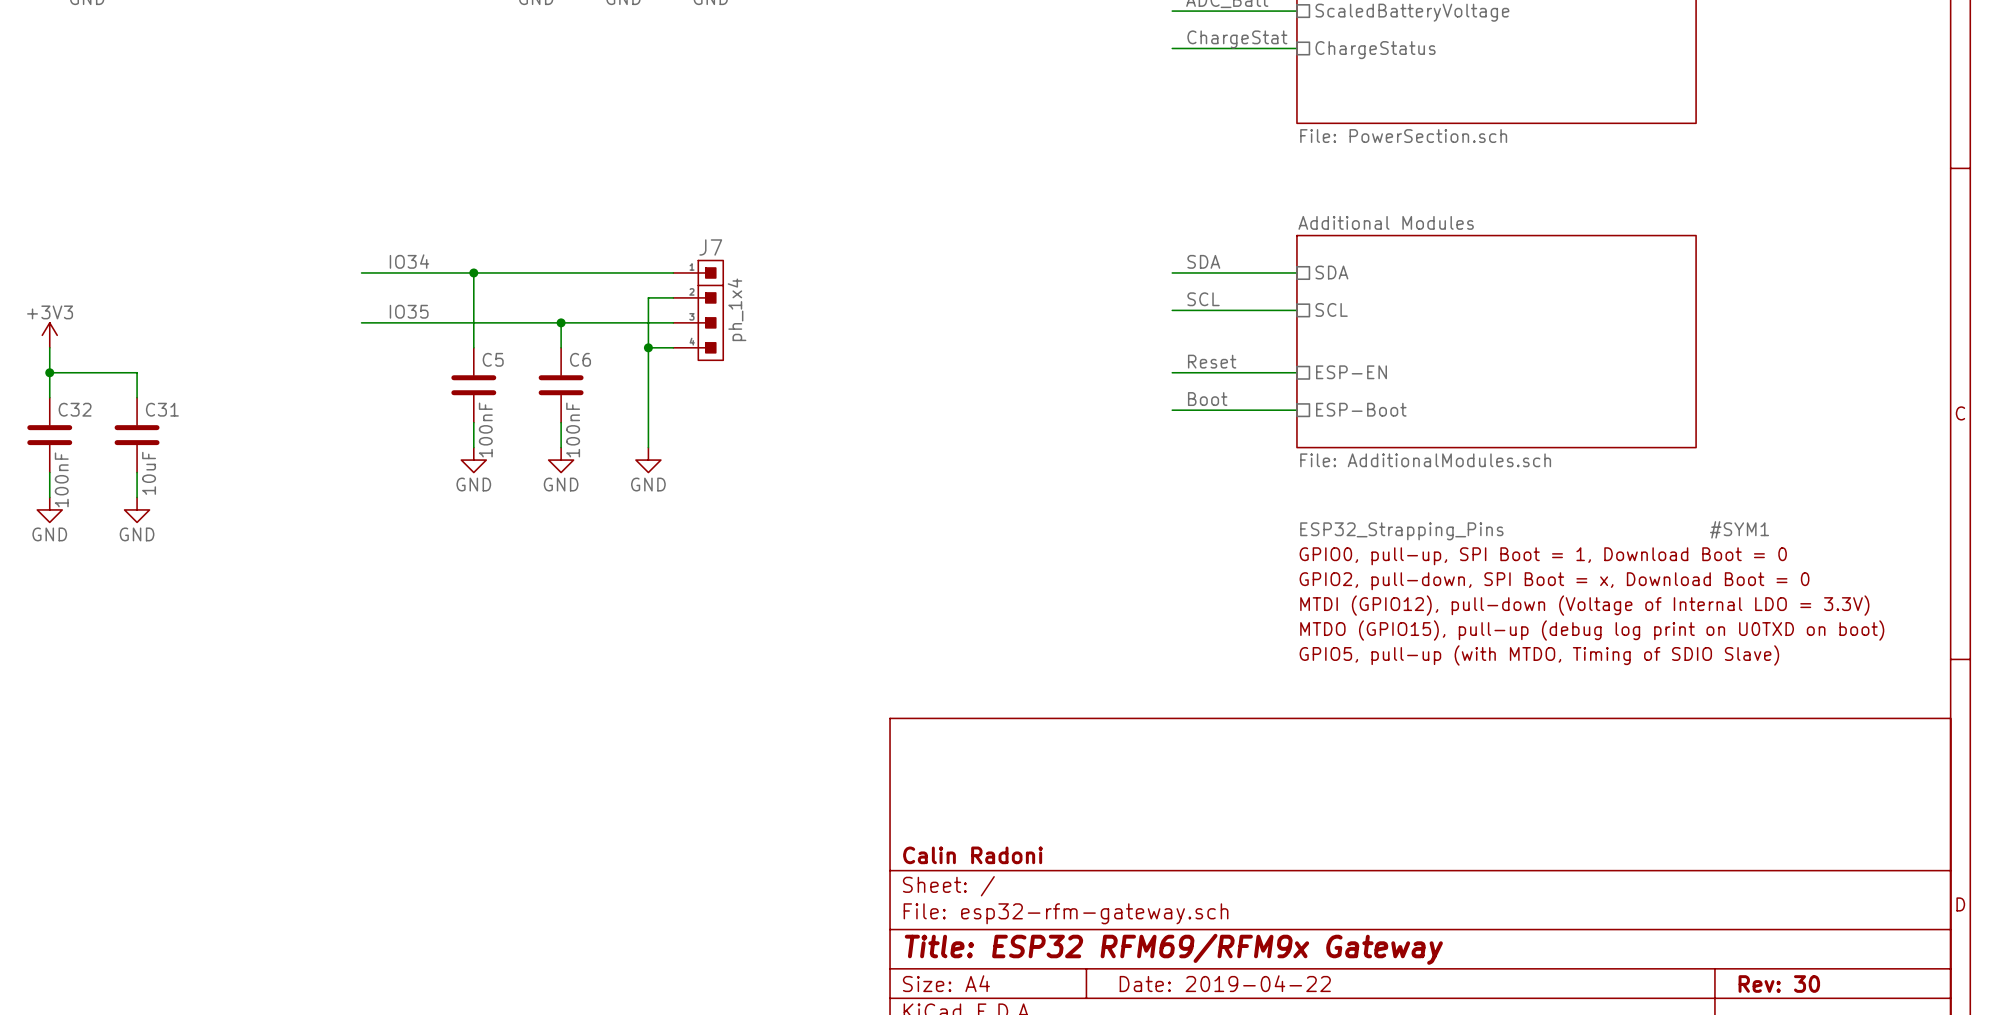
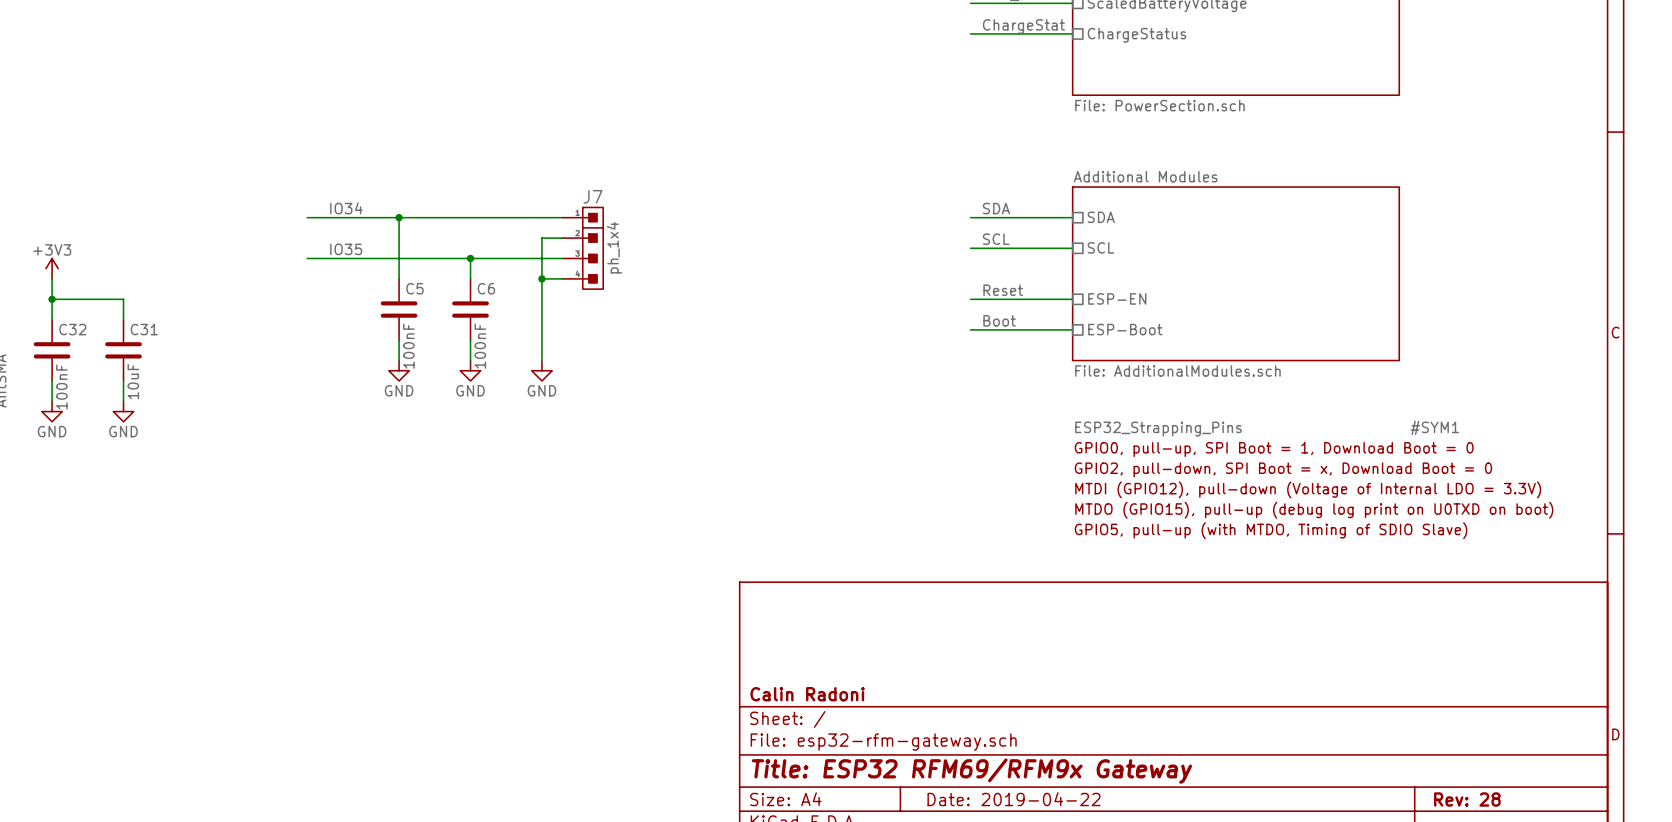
title block: Rev: 30 (1779, 984) -> Rev: 28 (1467, 799)

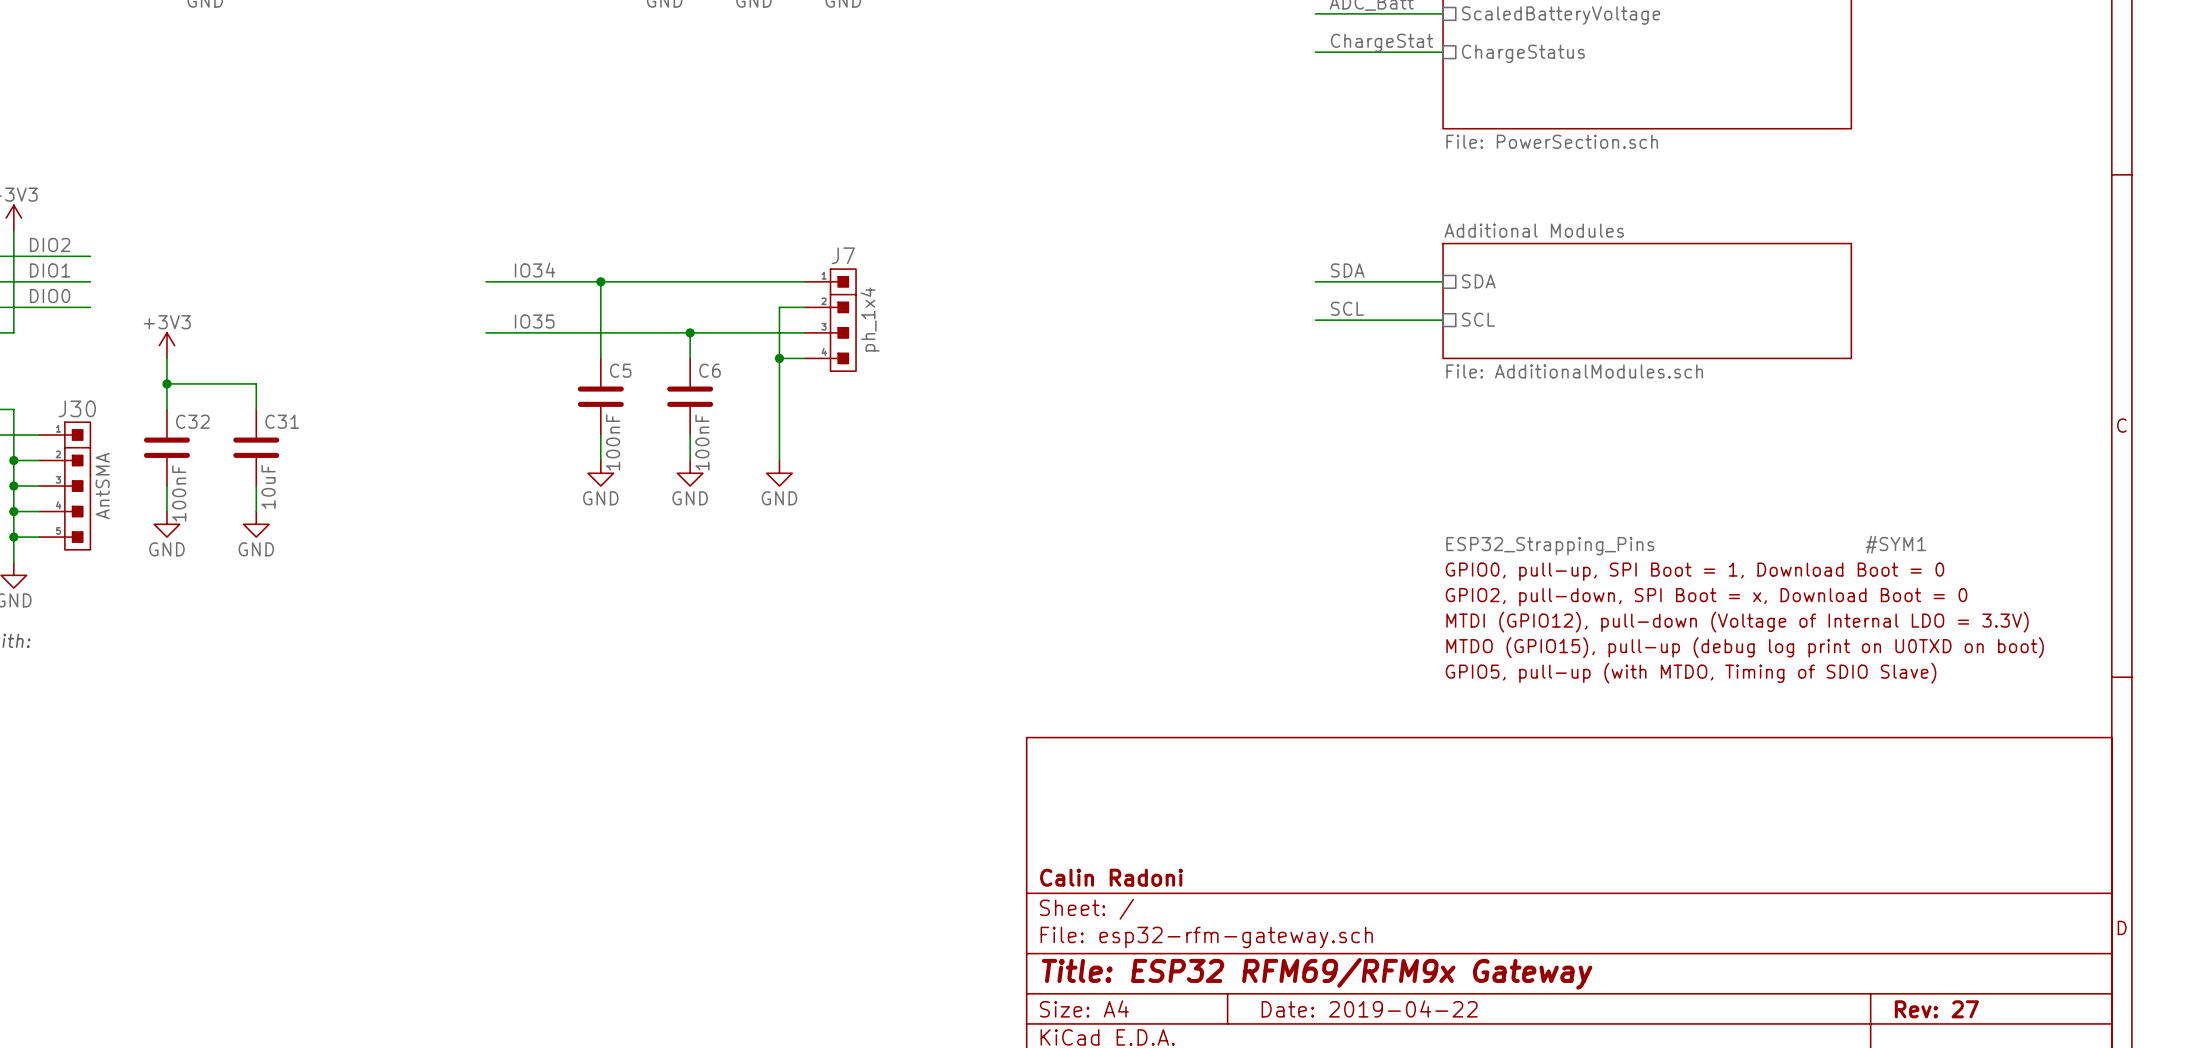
sheet Additional Modules: none -> File: AdditionalModules.sch (1647, 300)
sheet Additional Modules: File: AdditionalModules.sch (1235, 273) -> none
label: Reset (1003, 290) -> none
sheet pin: ESP-EN (1117, 298) -> none
wire: (970, 299) (1072, 299) -> none
label: Boot (999, 320) -> none
wire: (970, 329) (1072, 329) -> none
sheet pin: ESP-Boot (1125, 329) -> none
title block: Rev: 28 (1467, 799) -> Rev: 27 (1936, 1009)

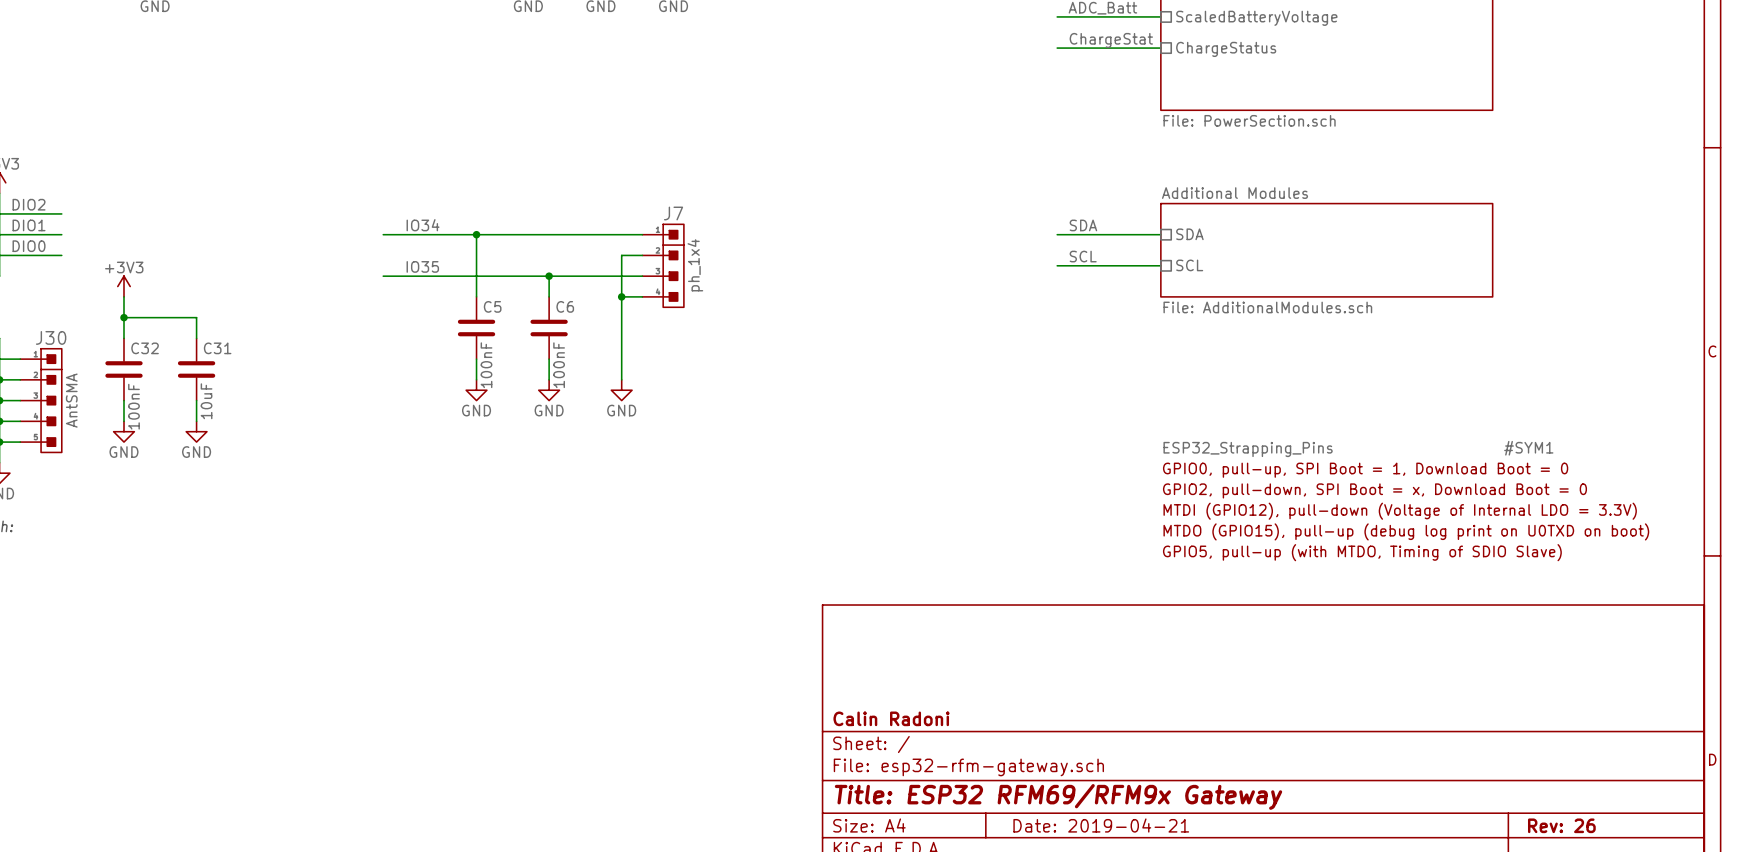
title block: Date: 2019-04-22 (1369, 1008) -> Date: 2019-04-21 (1101, 825)
title block: Rev: 27 (1936, 1009) -> Rev: 26 (1561, 825)

